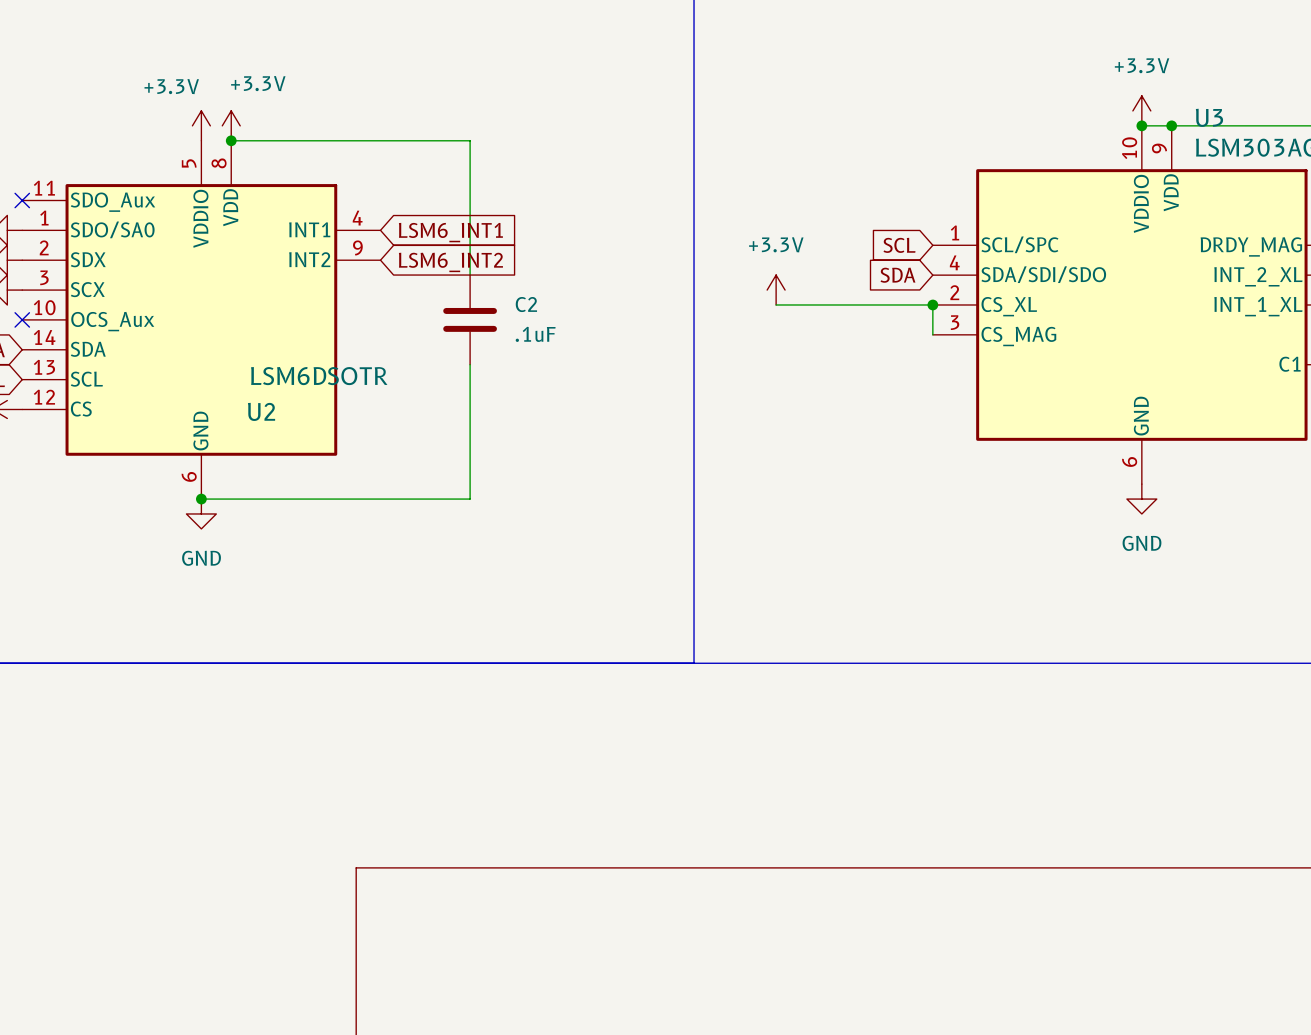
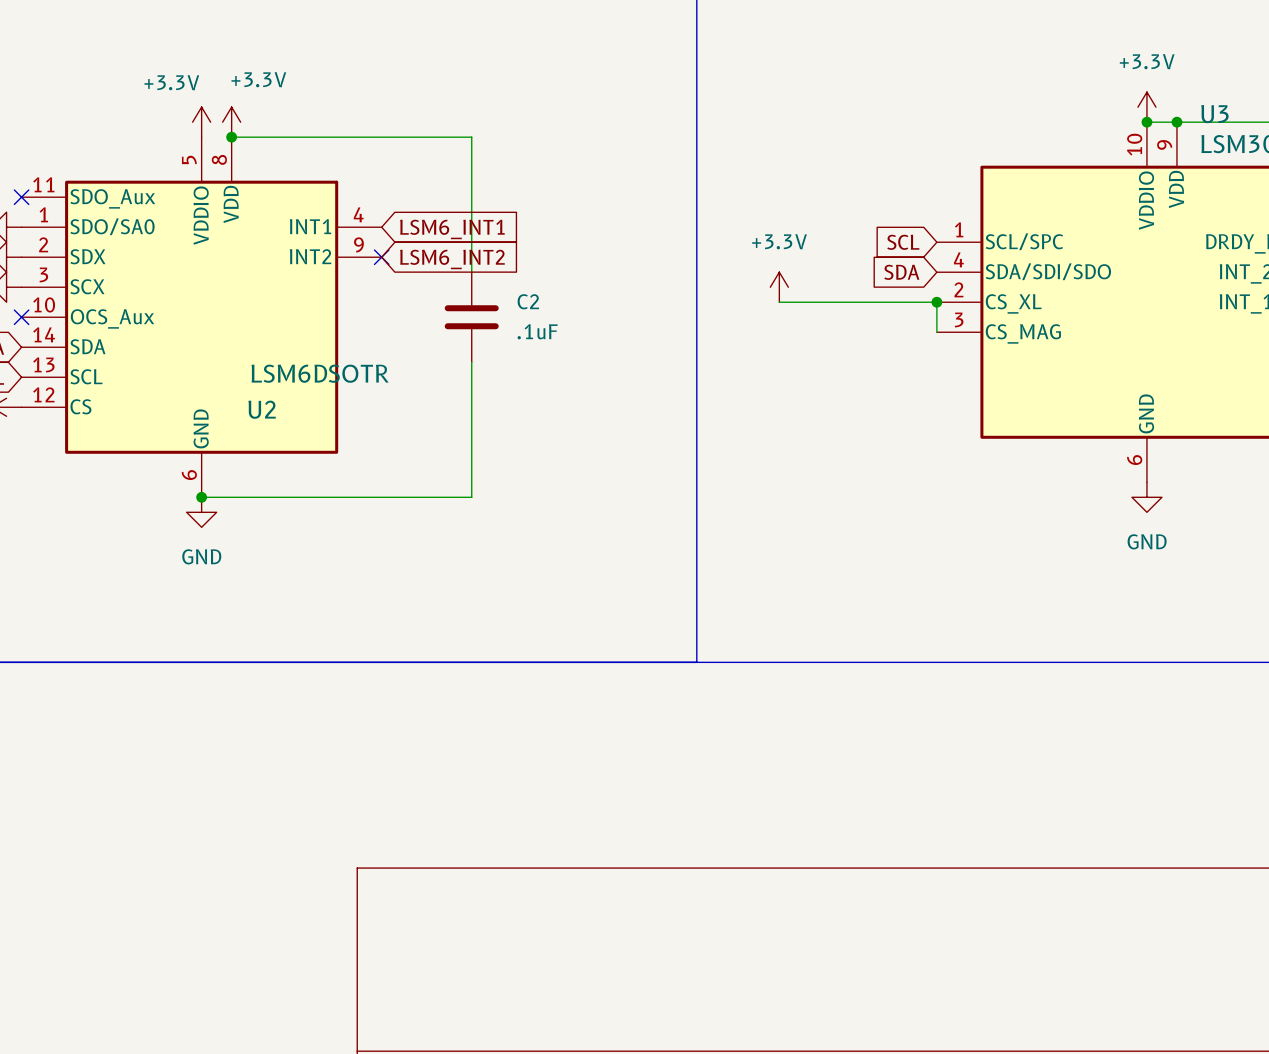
no-connect mark: none -> (381, 257)

